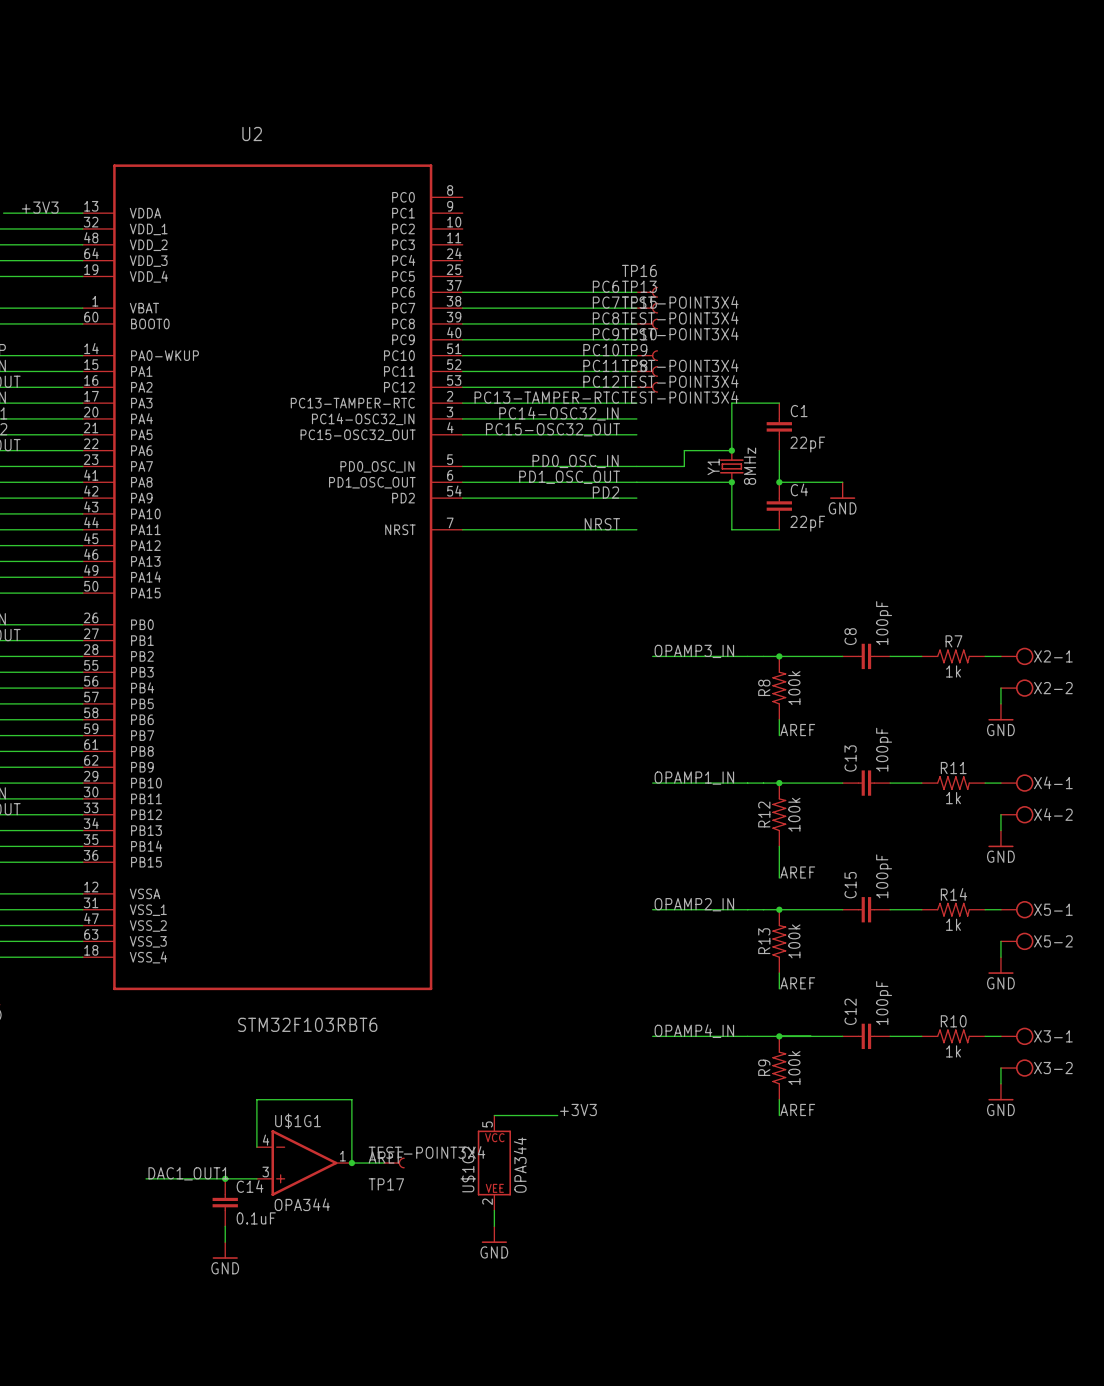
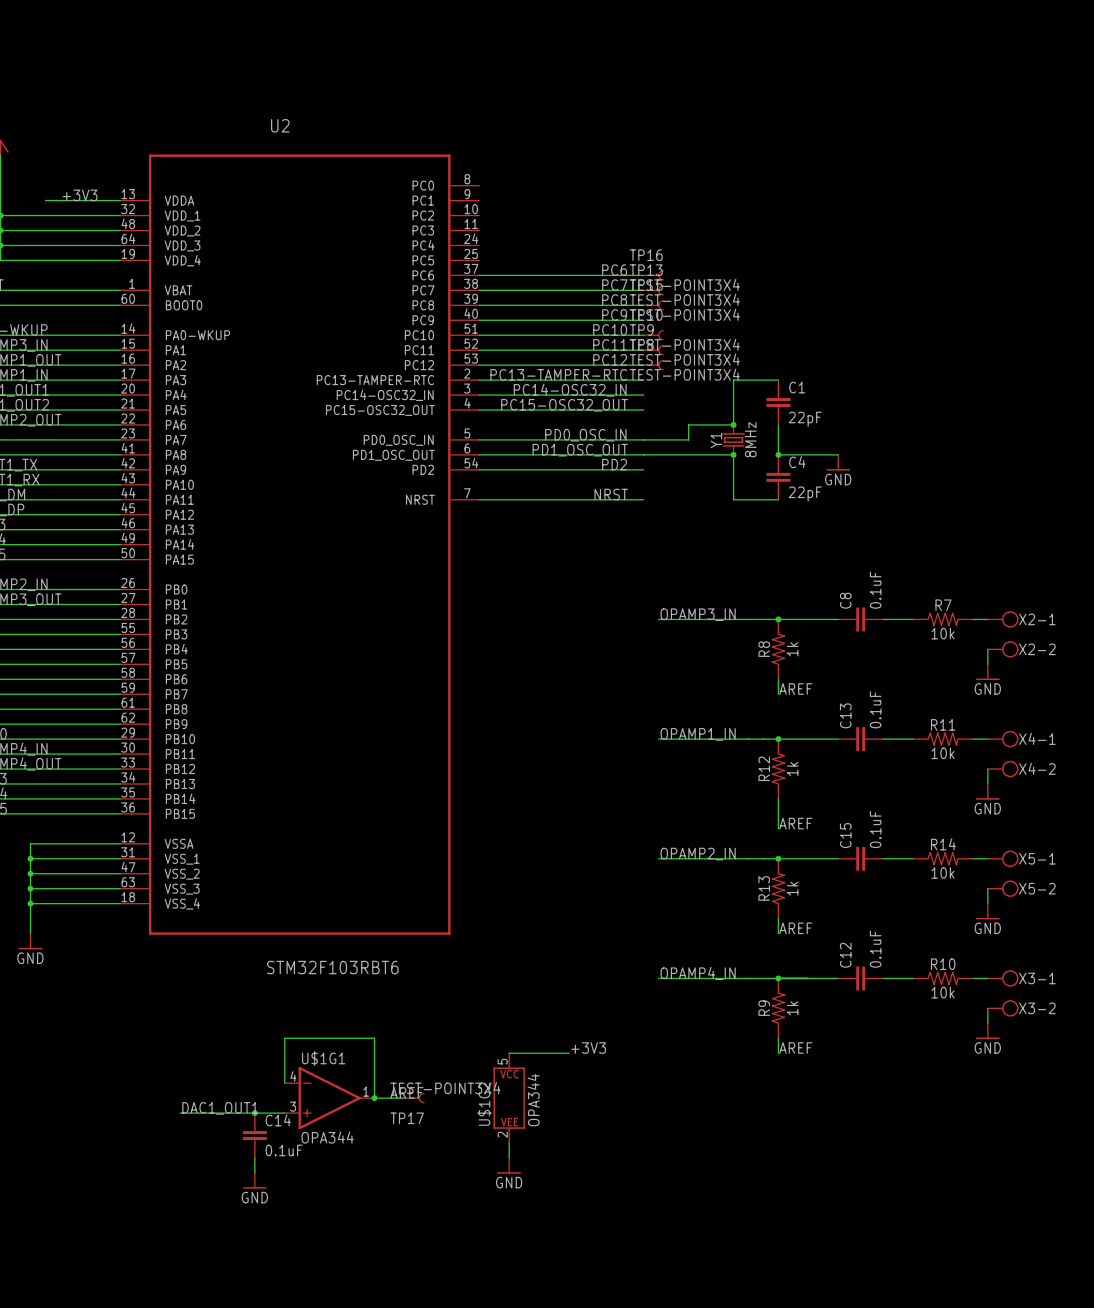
C8 value: 100pF (884, 623) -> 0.1uF (875, 590)
R7 value: 1k (953, 671) -> 10k (942, 633)
R8 value: 100k (794, 688) -> 1k (792, 649)
C13 value: 100pF (884, 749) -> 0.1uF (875, 709)
R11 value: 1k (953, 798) -> 10k (942, 753)
R12 value: 100k (794, 814) -> 1k (792, 769)
C15 value: 100pF (884, 876) -> 0.1uF (875, 829)
R14 value: 1k (953, 924) -> 10k (942, 872)
R13 value: 100k (794, 941) -> 1k (792, 888)
C12 value: 100pF (884, 1003) -> 0.1uF (875, 949)
R10 value: 1k (953, 1051) -> 10k (942, 992)
R9 value: 100k (794, 1068) -> 1k (792, 1008)

